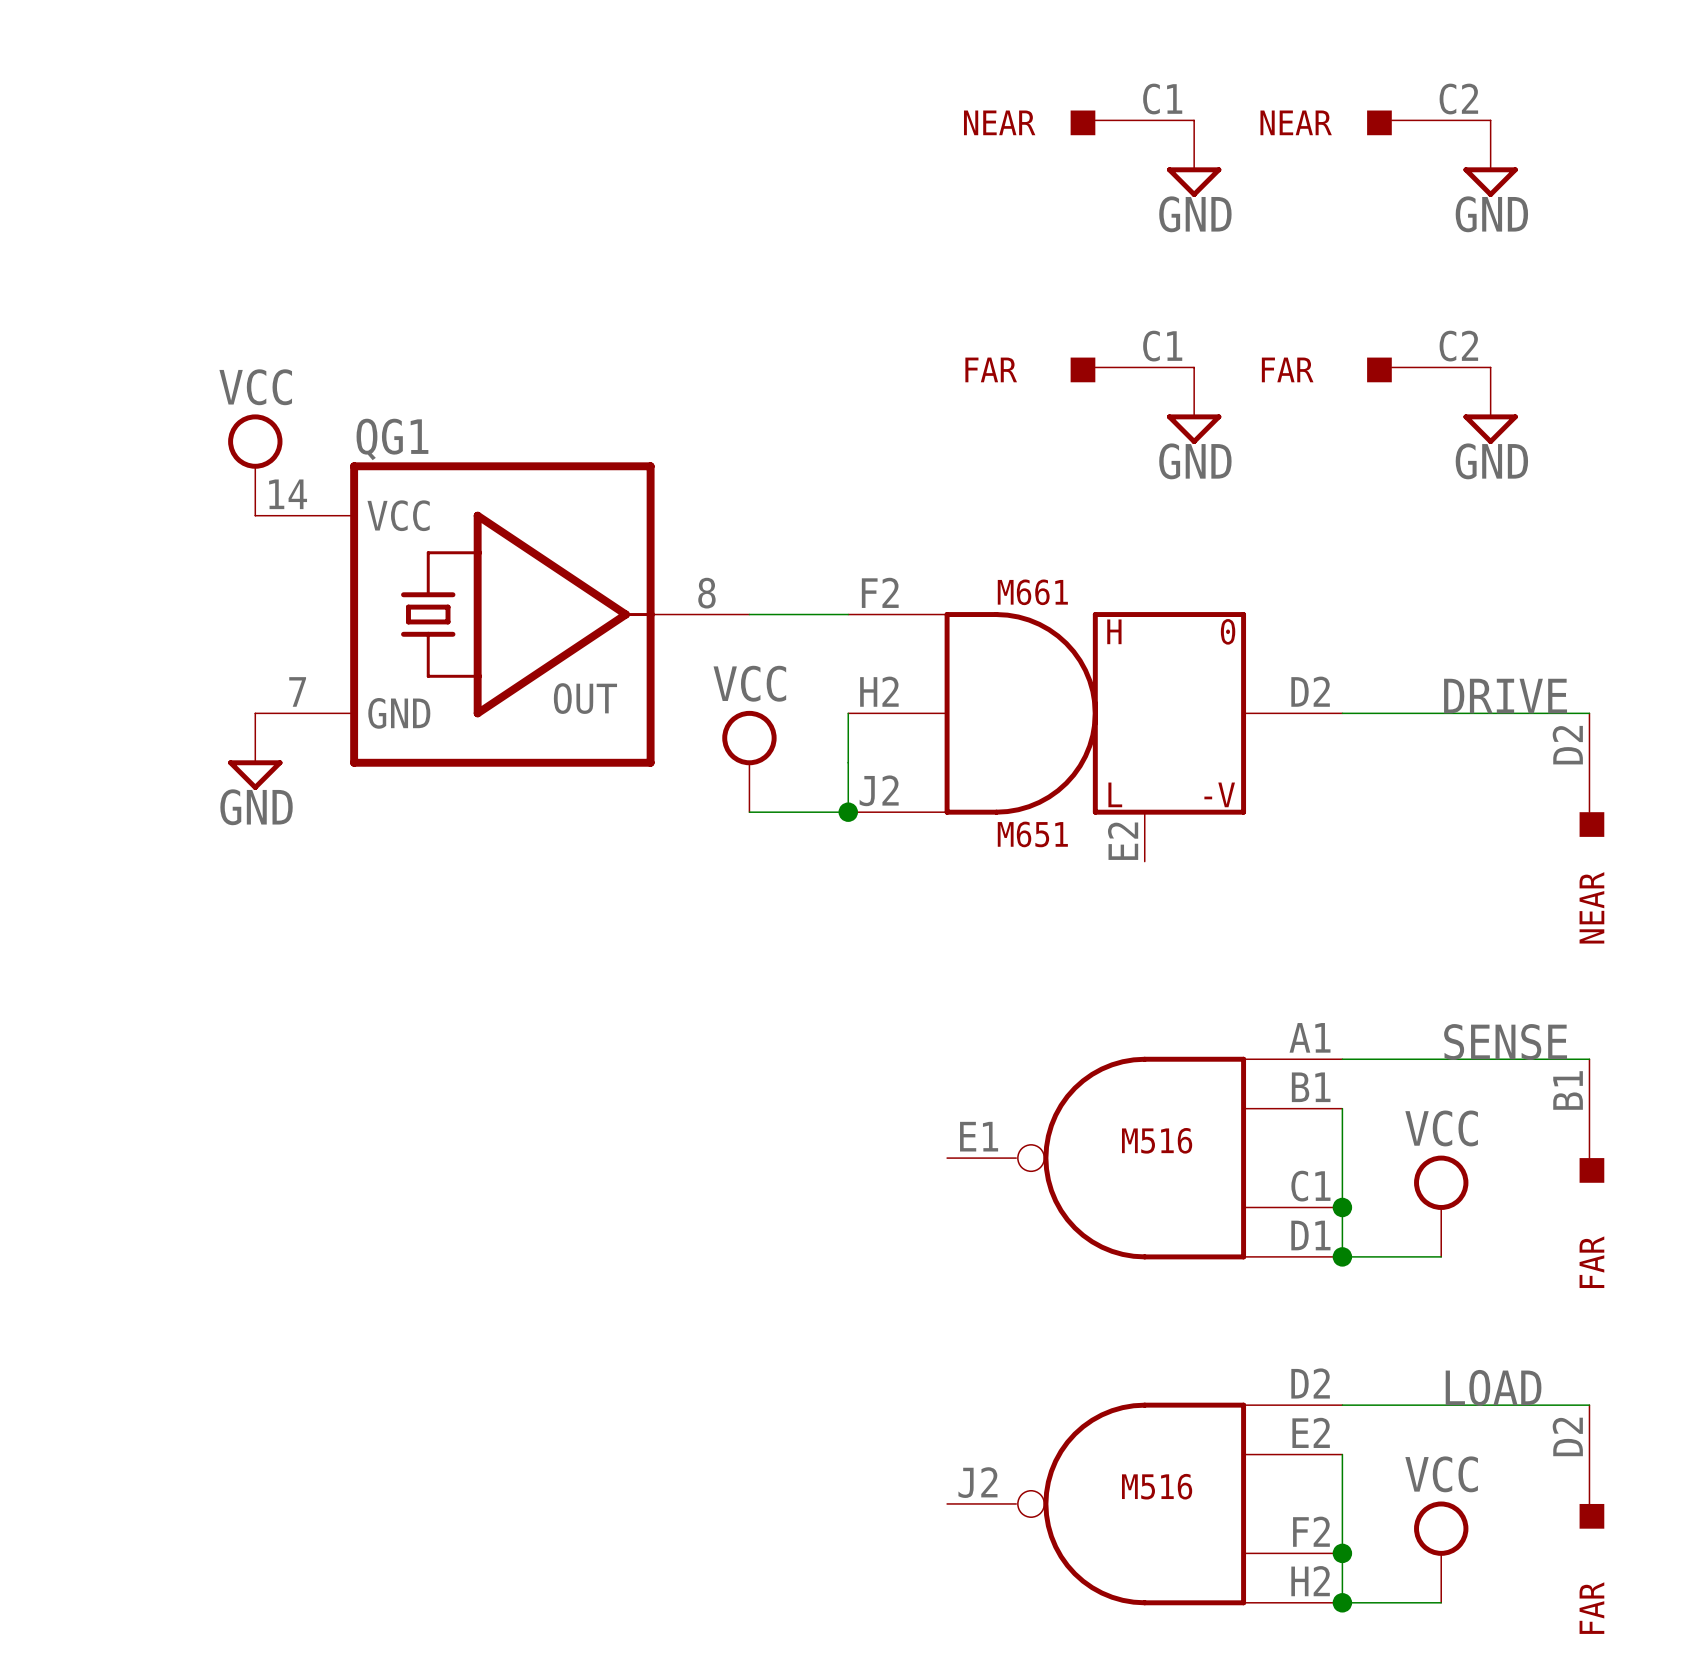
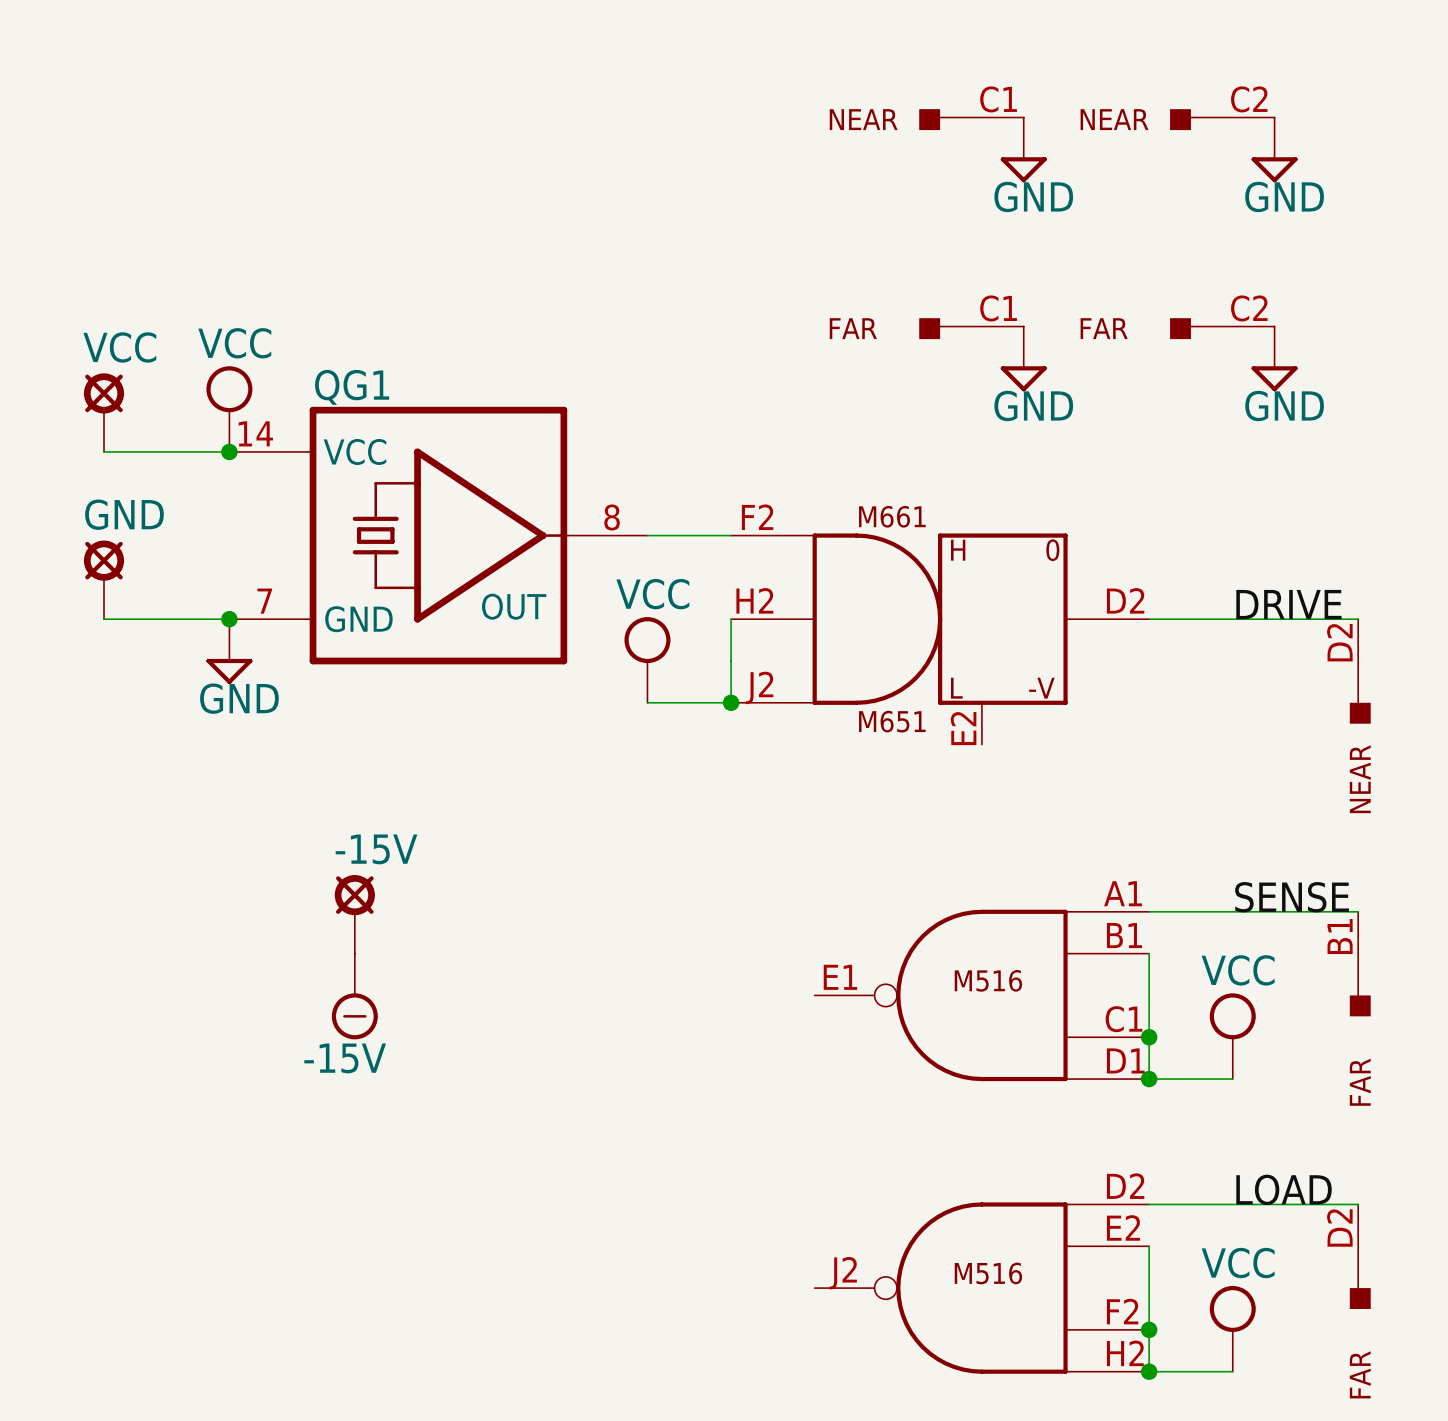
VCC: none -> (103, 412)
wire: none -> (103, 451) (229, 451)
junction: none -> (229, 451)
GND: none -> (103, 579)
wire: none -> (103, 619) (229, 619)
junction: none -> (229, 619)
-15V: none -> (354, 914)
power symbol: none -> -15V (354, 996)

